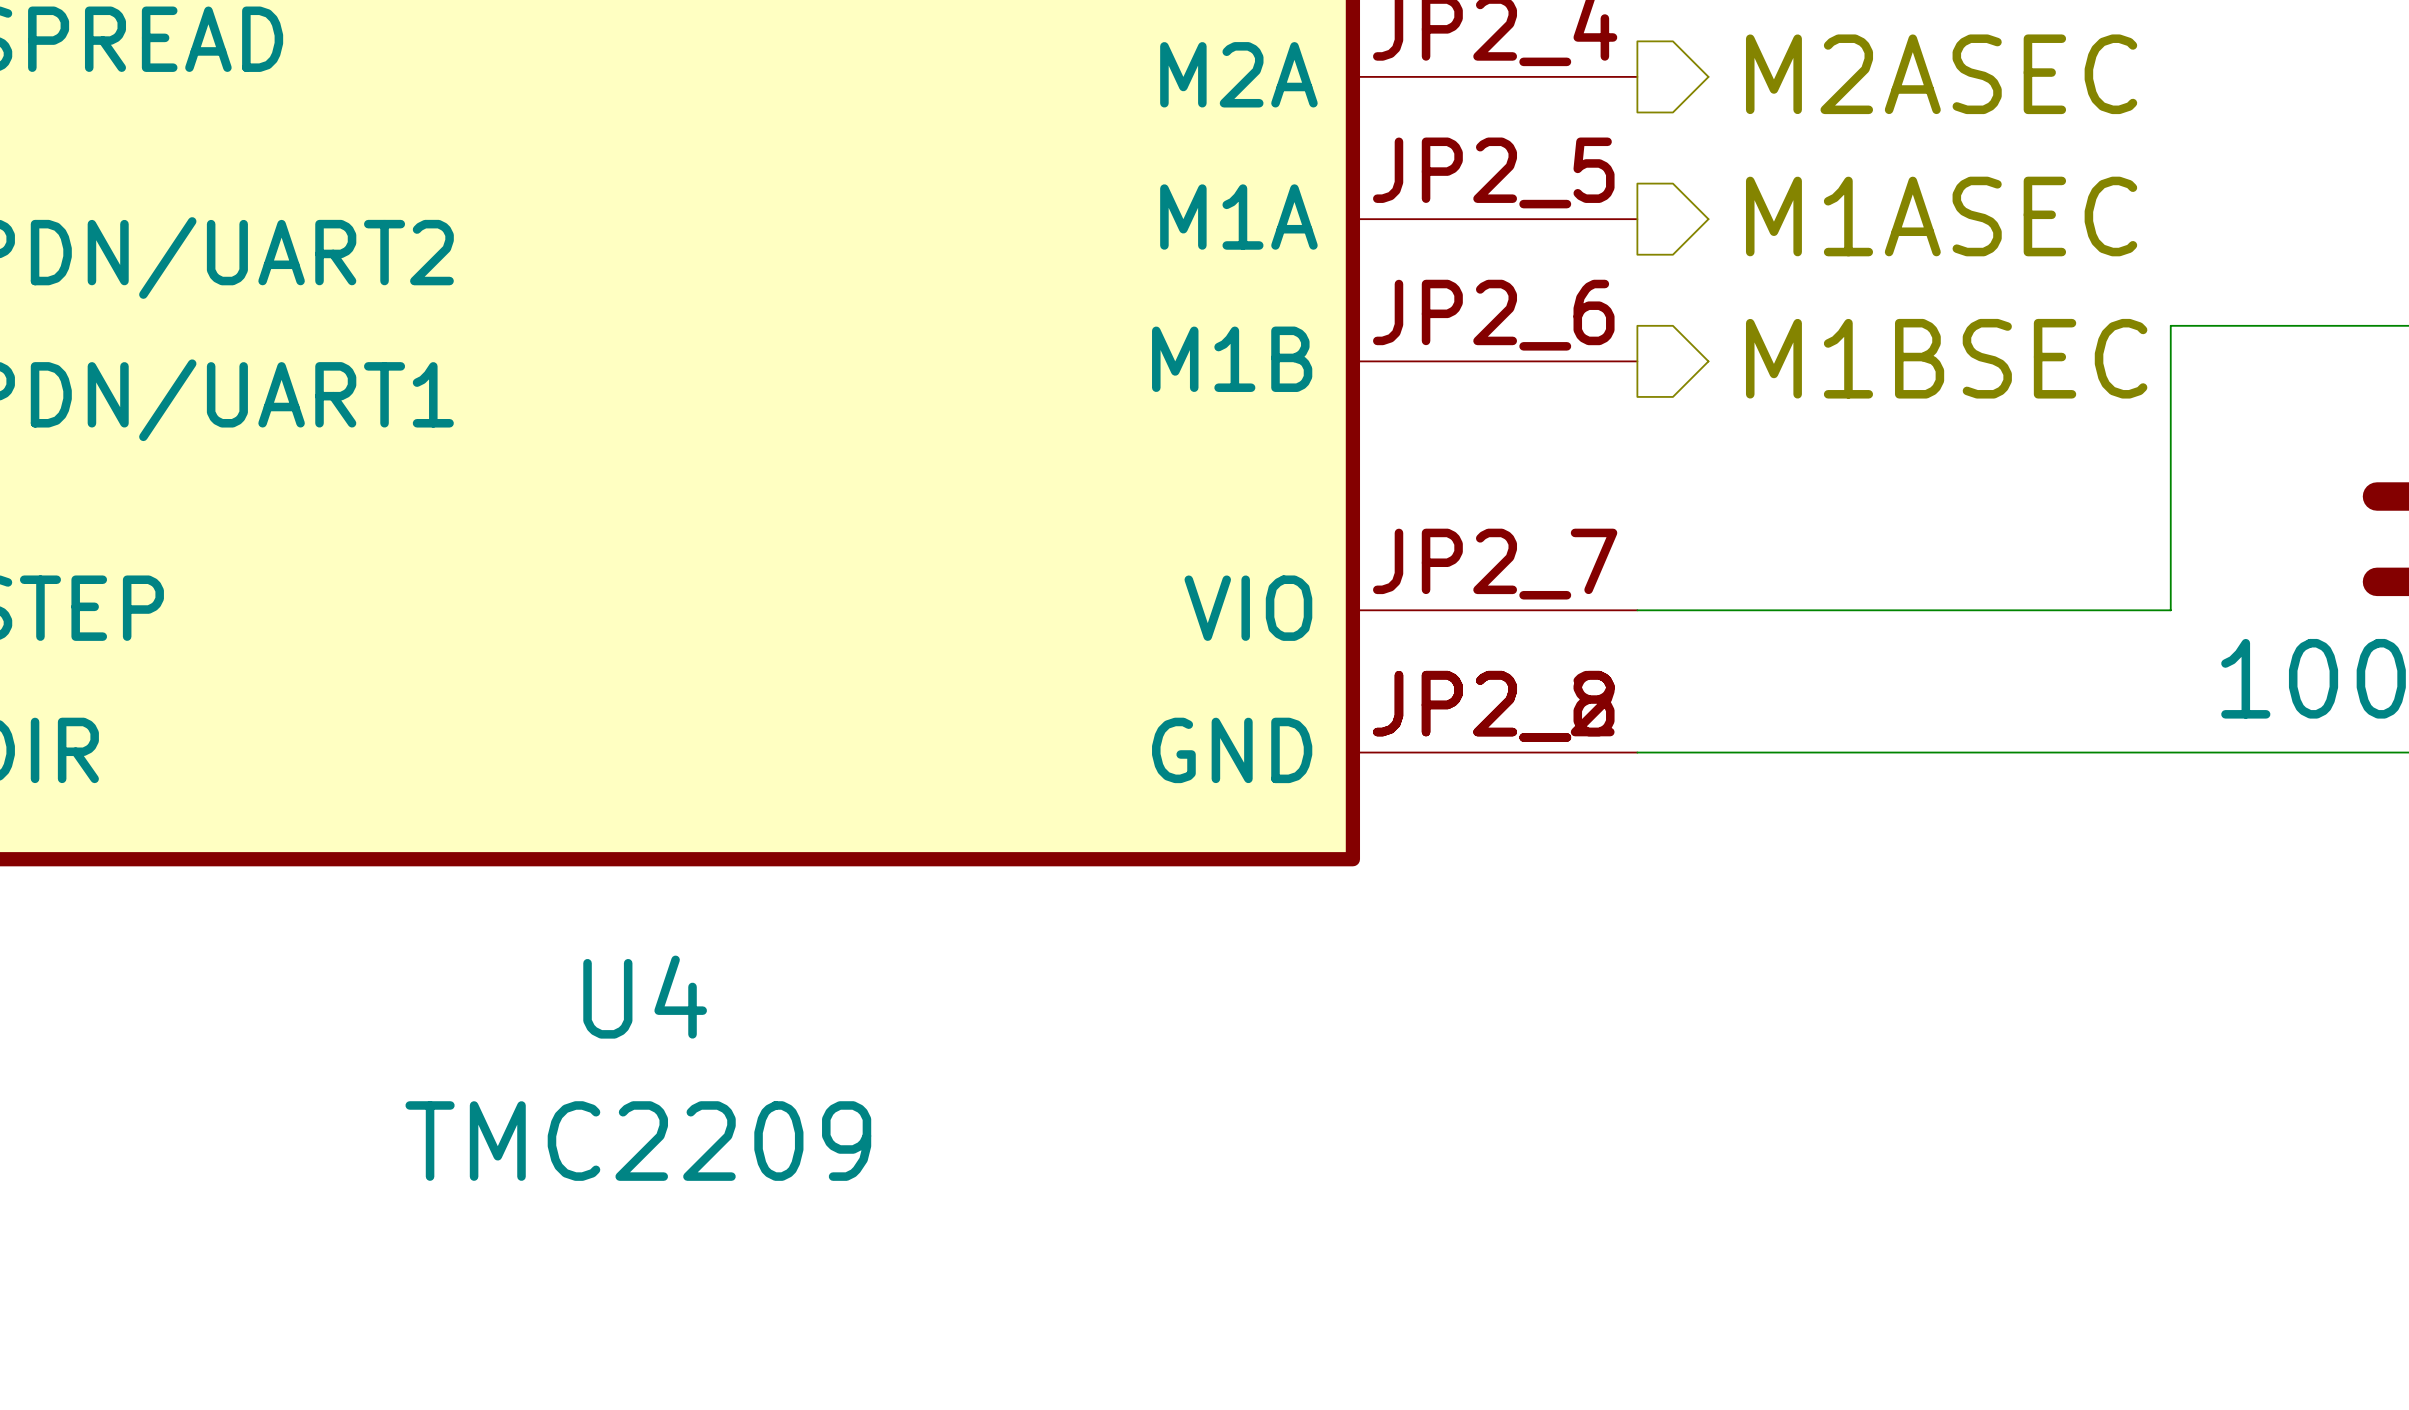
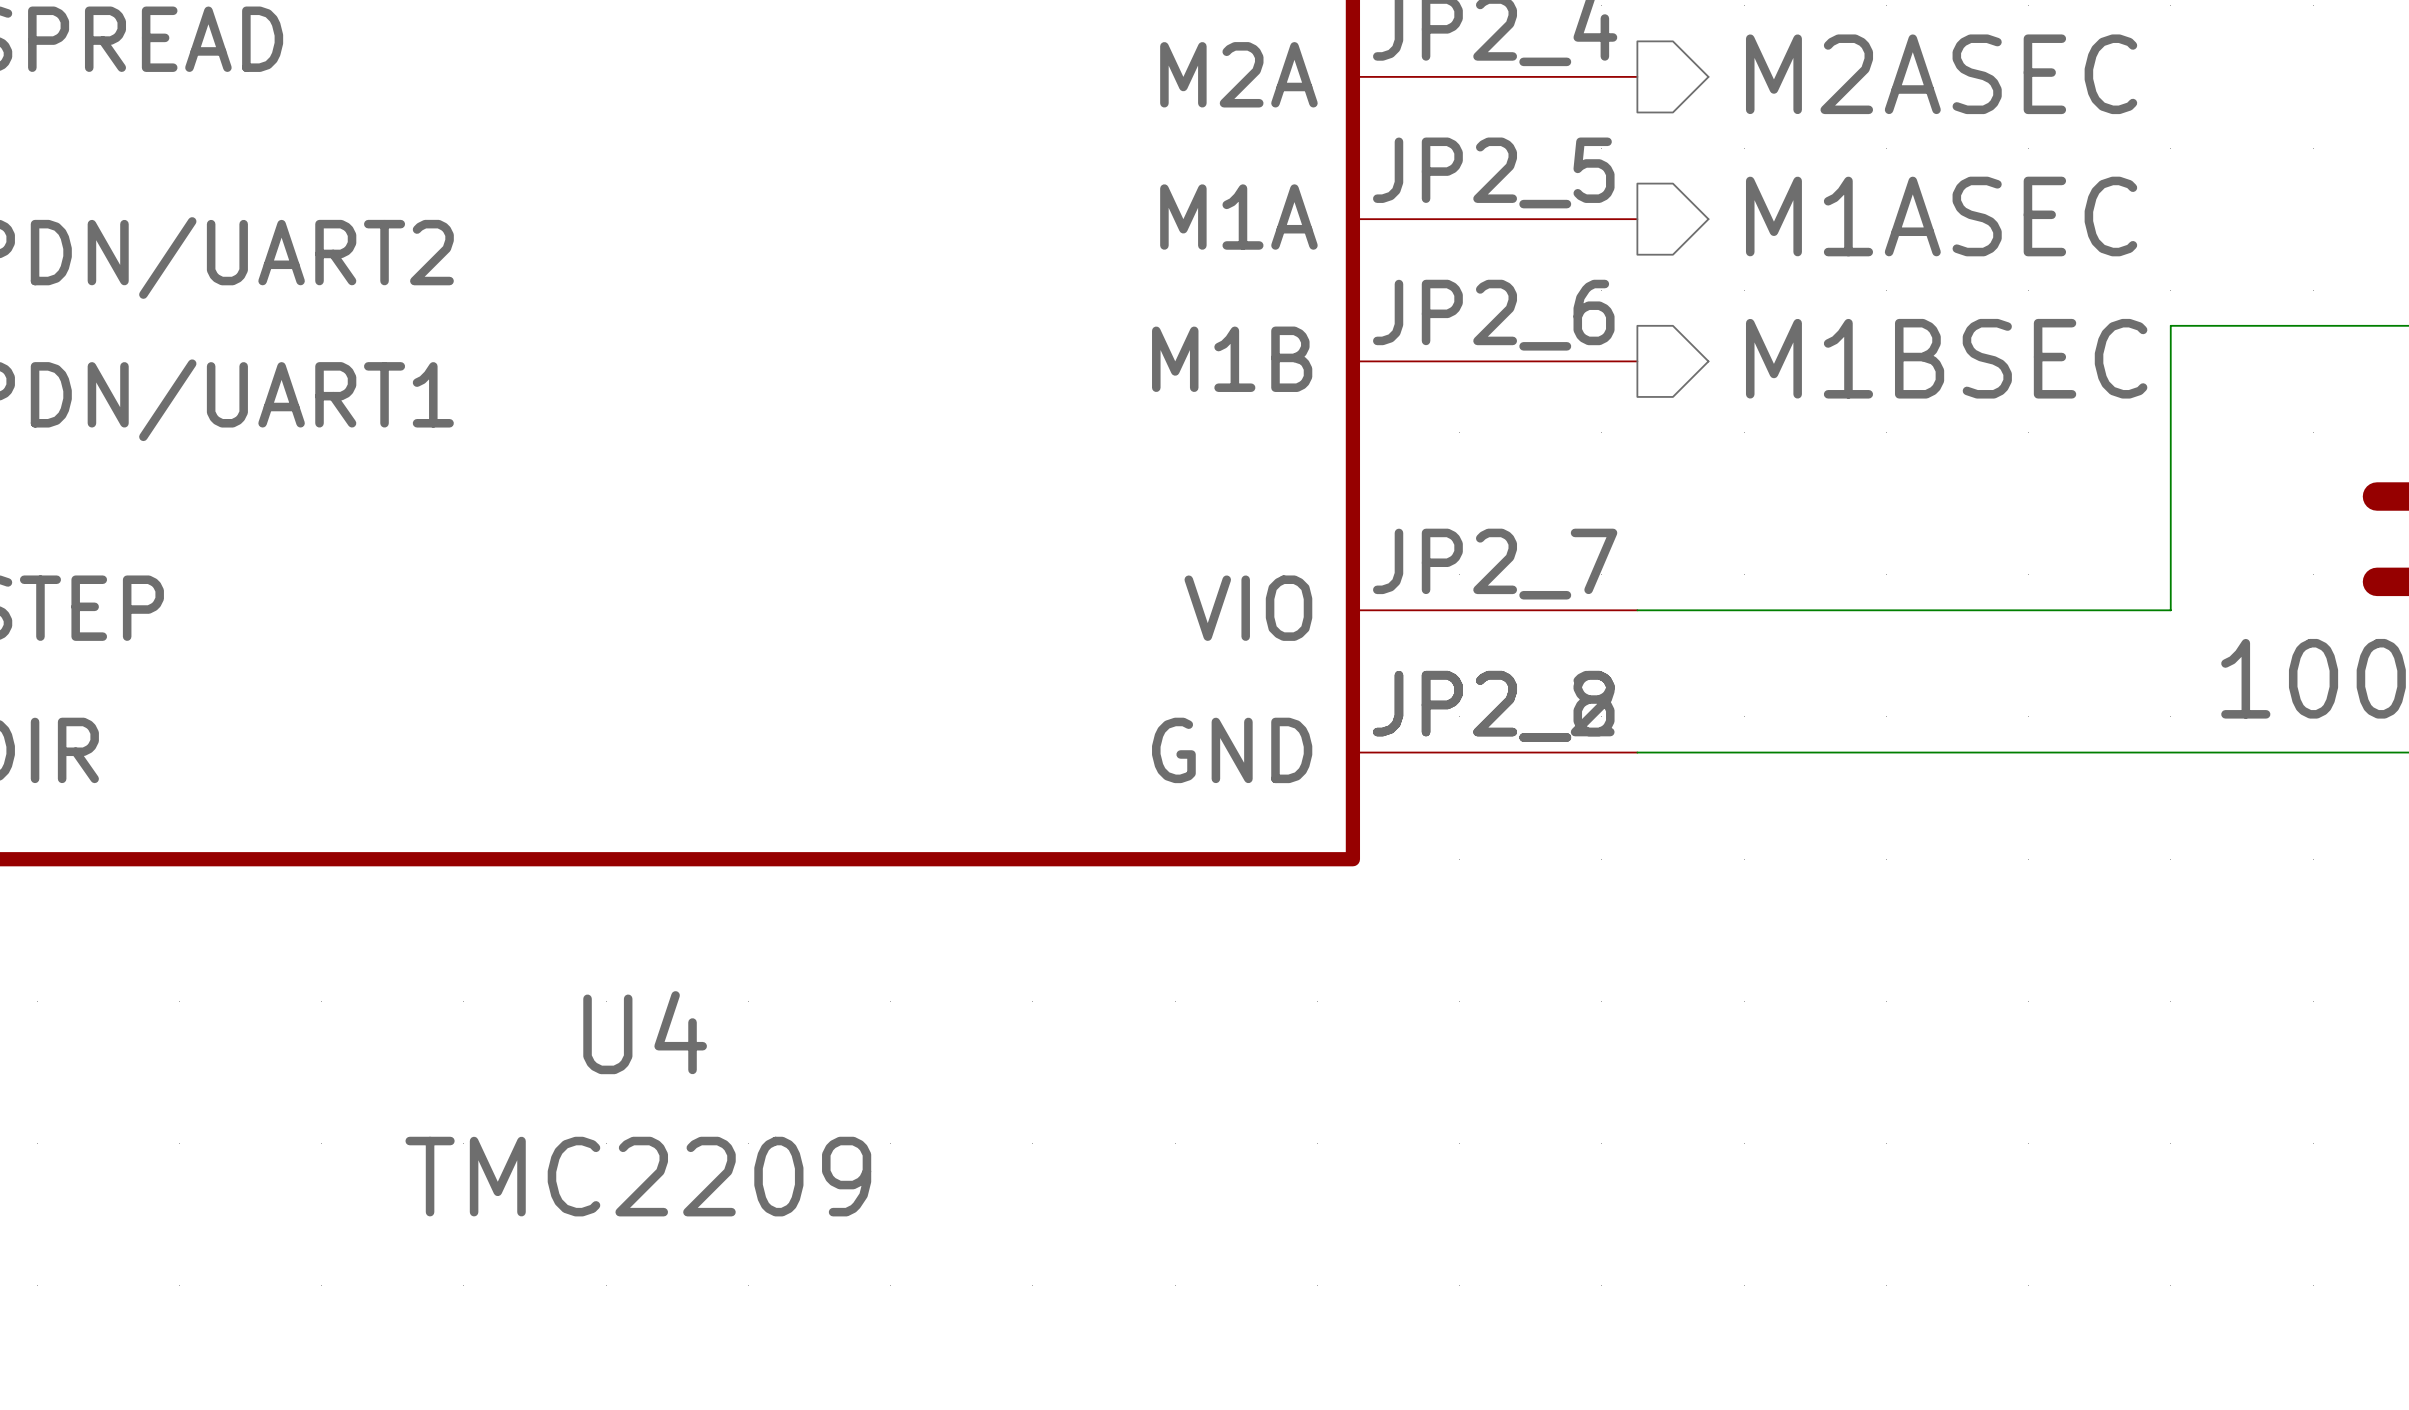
U4 name position: U4 (645, 997) -> U4 (645, 1032)
U4 value position: TMC2209 (638, 1141) -> TMC2209 (638, 1176)

